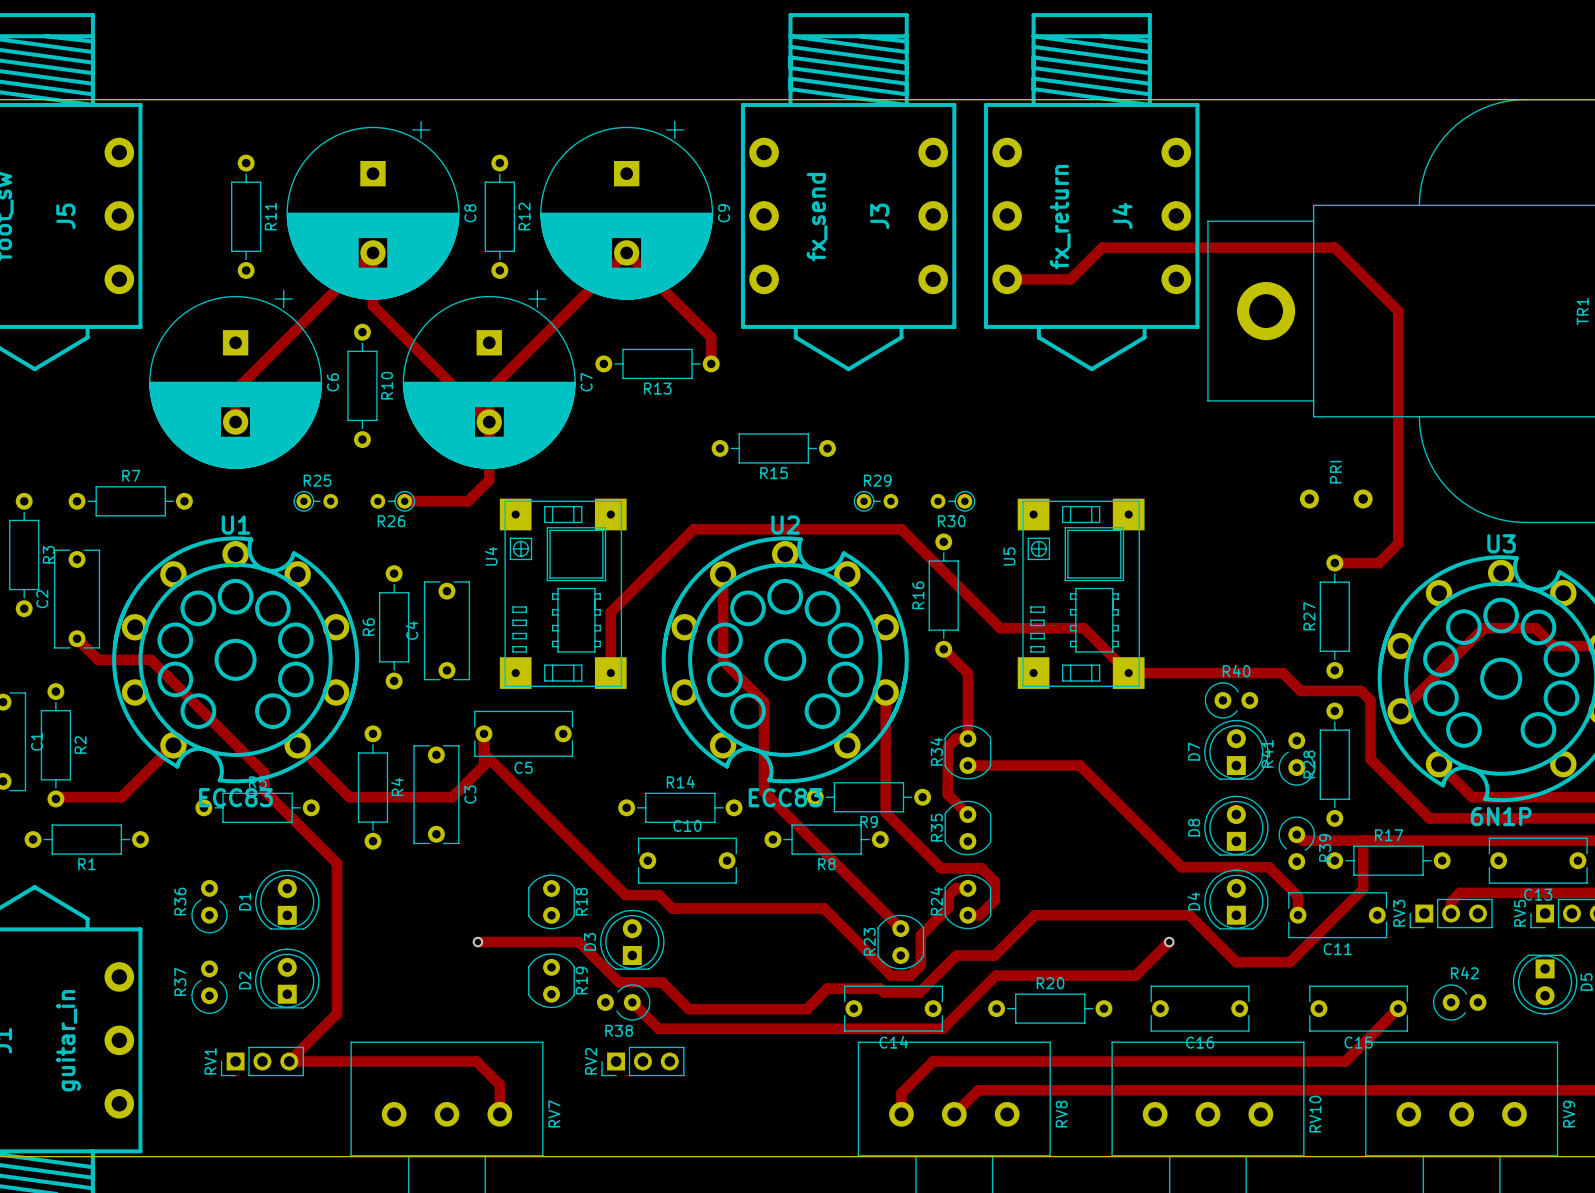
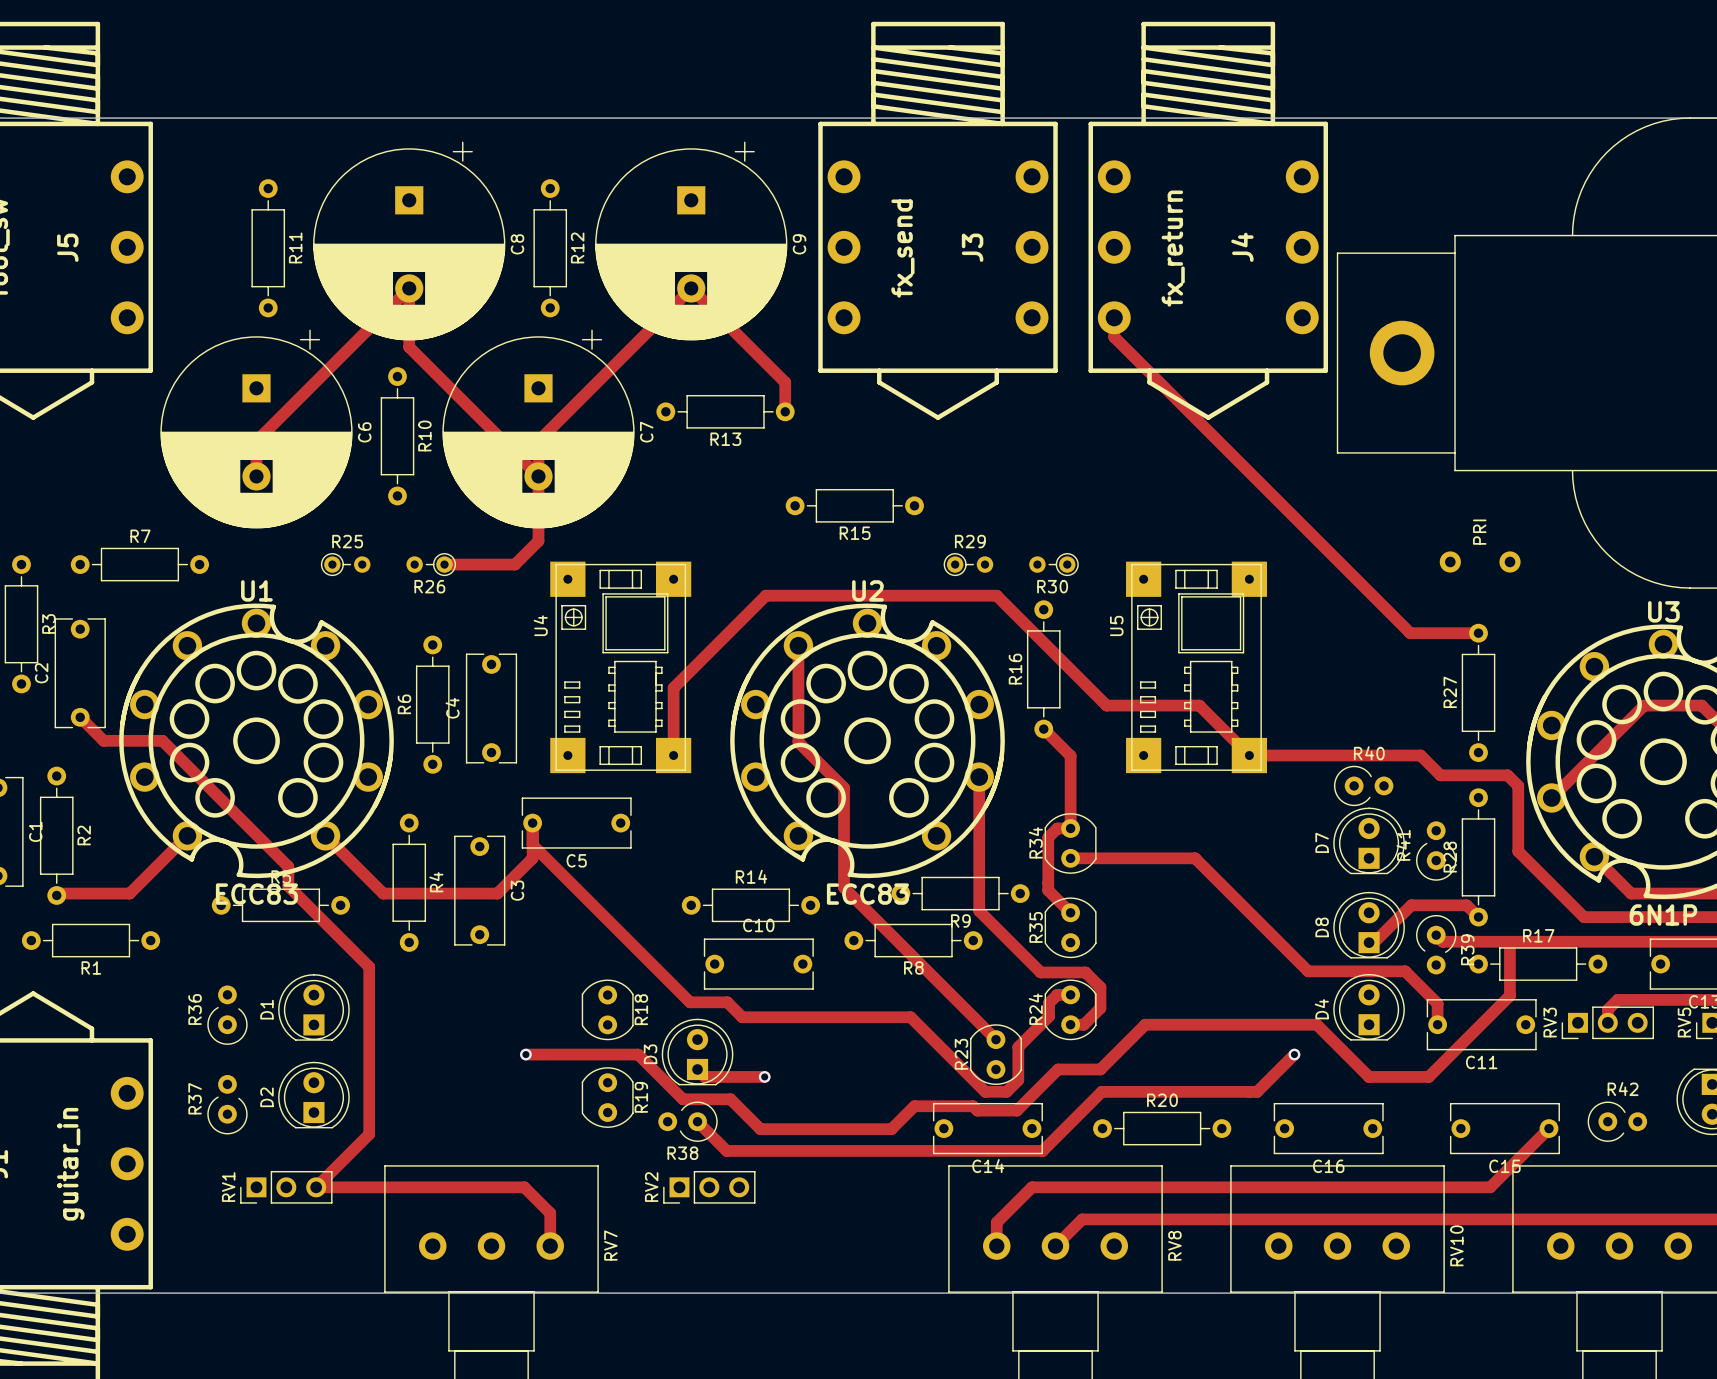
track: (1007, 279) (1070, 279) (1102, 247) (1334, 247) (1398, 311) (1398, 543) (1378, 563) (1334, 563) -> (1114, 317) (1114, 337) (1410, 633) (1478, 633)
track: none -> (1478, 917) (1466, 905) (1411, 905) (1374, 942) (1369, 942)
track: none -> (697, 1069) (704, 1076) (764, 1076)
via: none -> (764, 1076)

